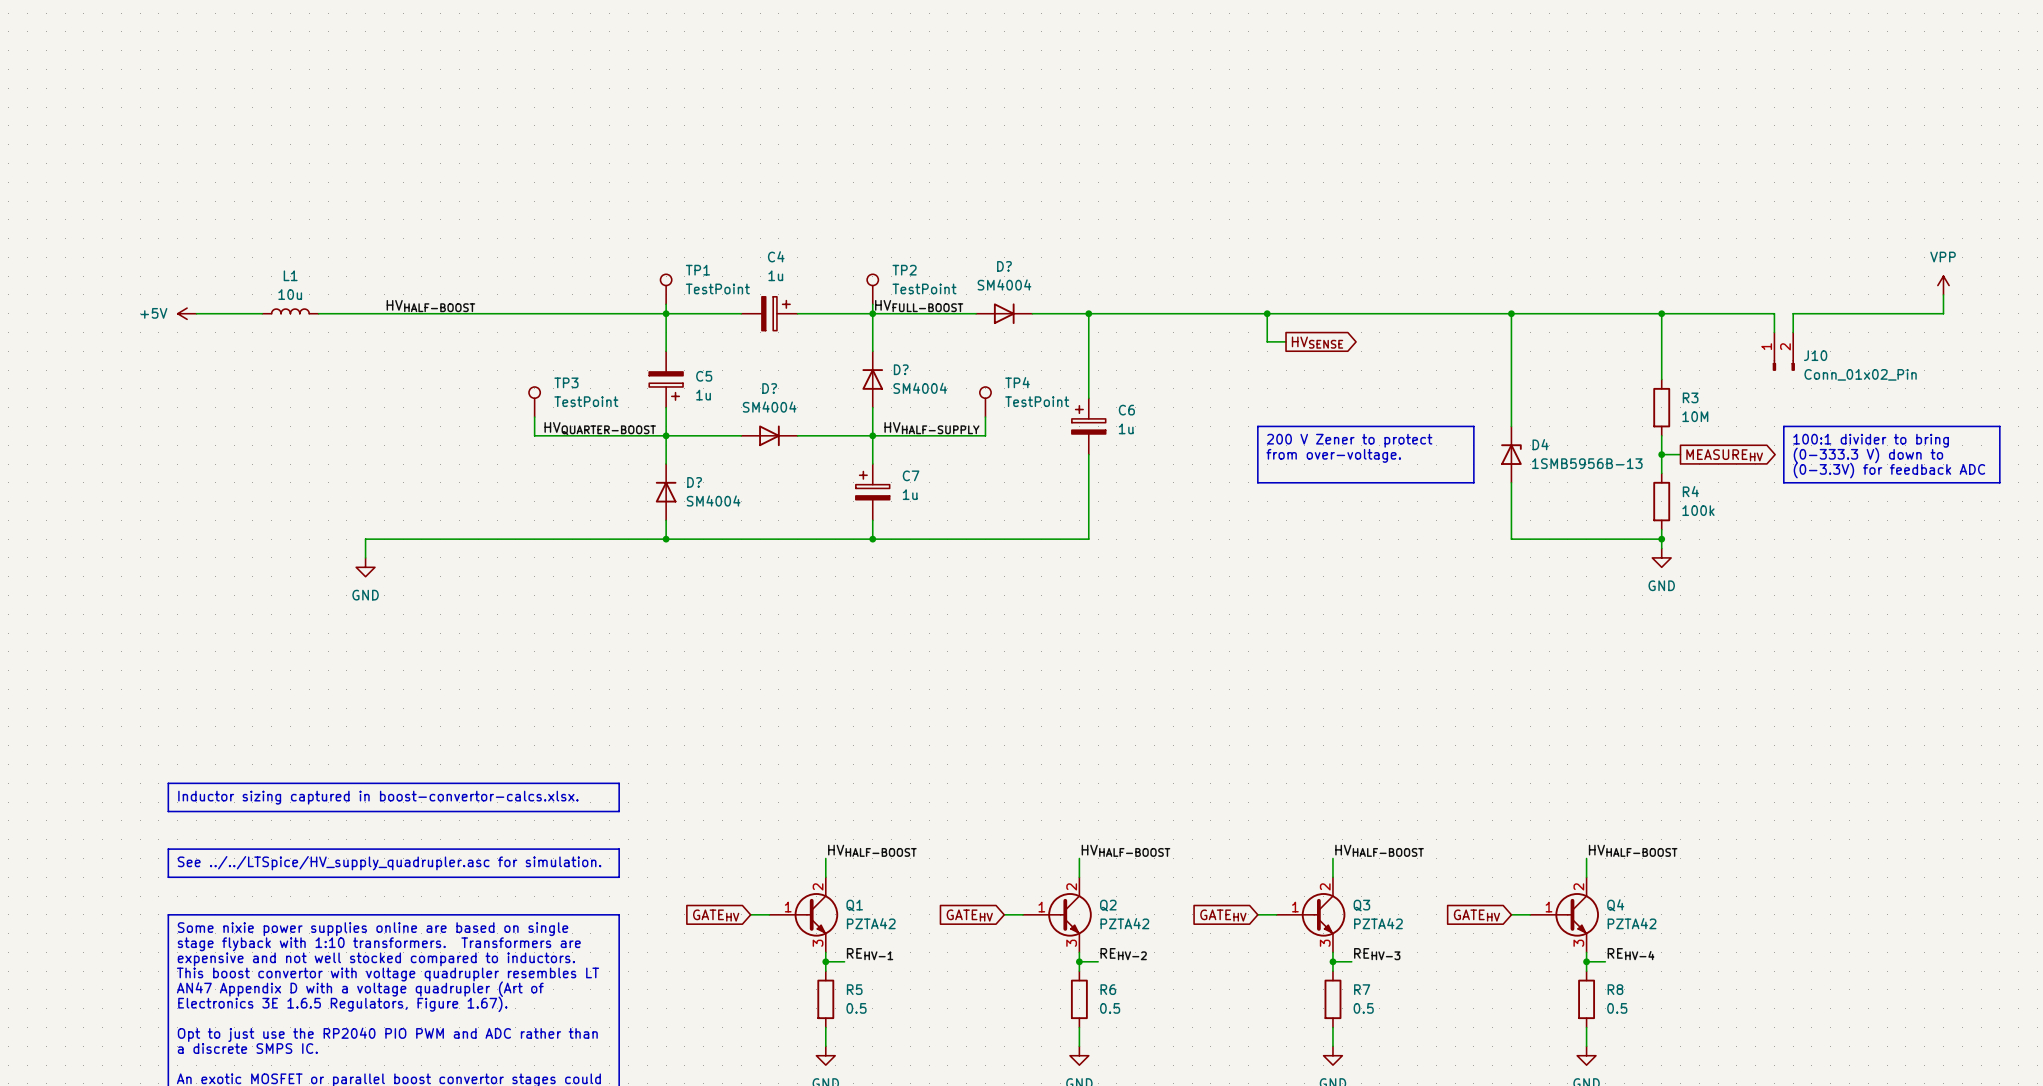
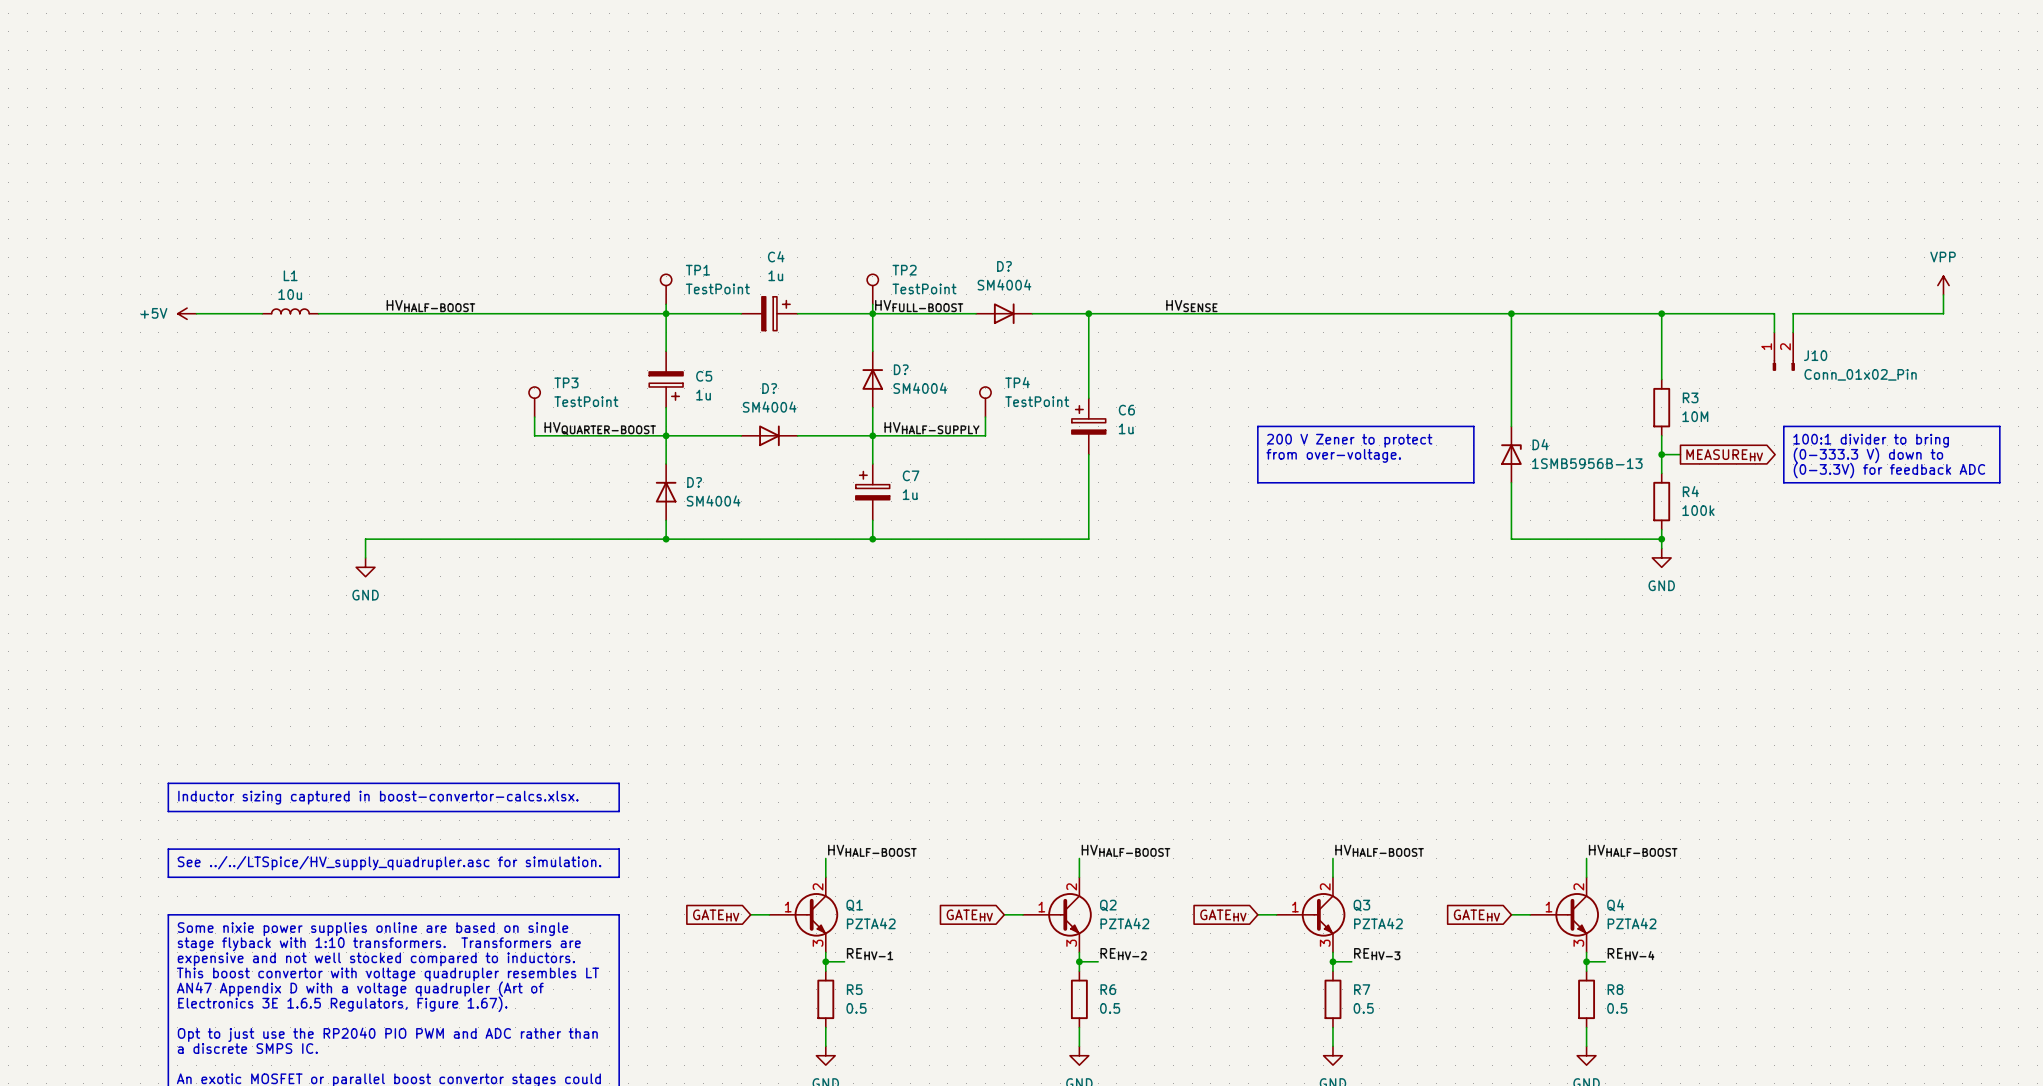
label: none -> HVSENSE (1191, 306)
wire: (1267, 313) (1267, 341) (1286, 341) -> none
junction: (1267, 313) -> none
global label: HVSENSE (1317, 342) -> none

